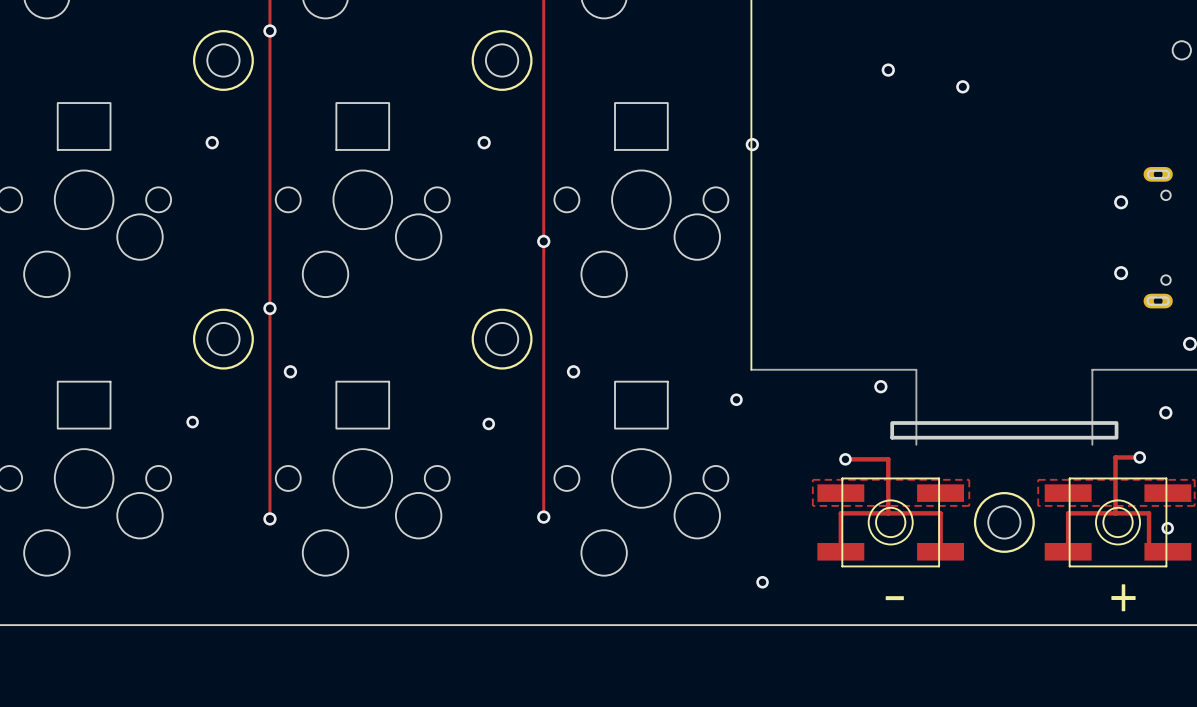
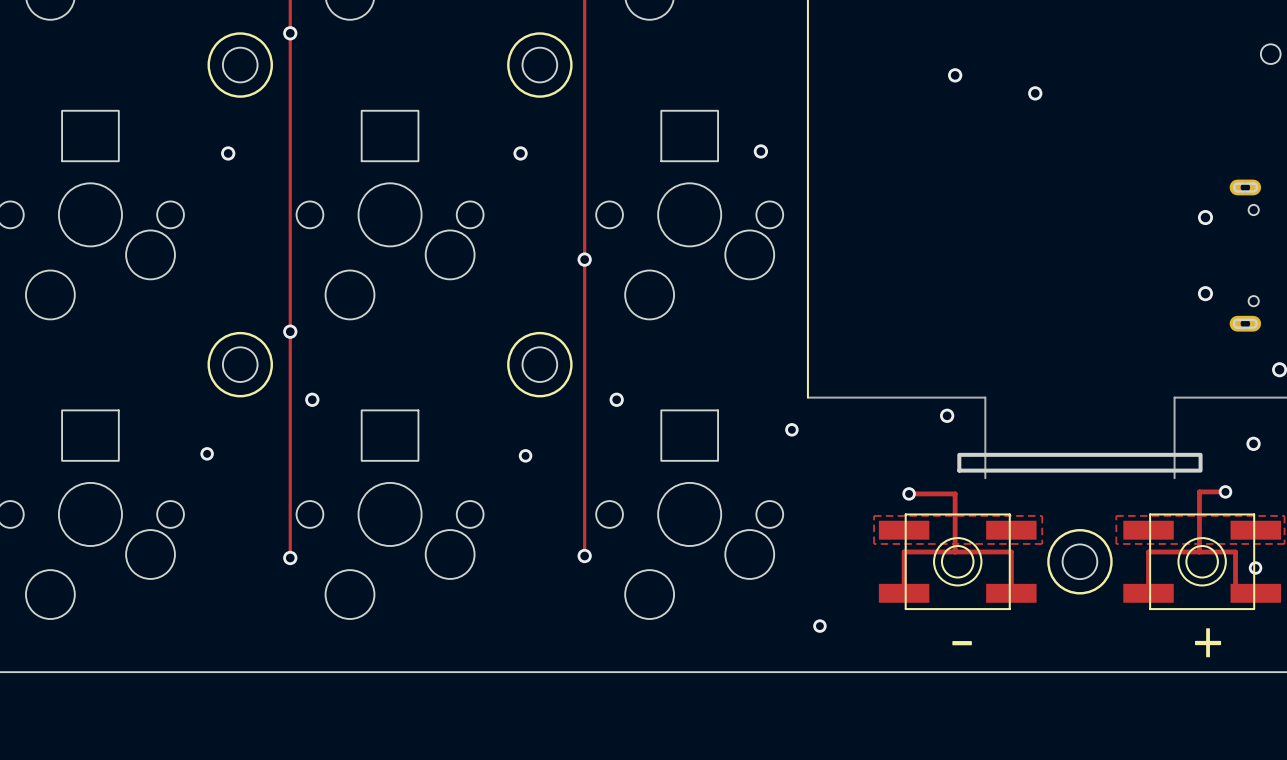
via position: (752, 144) -> (760, 151)

